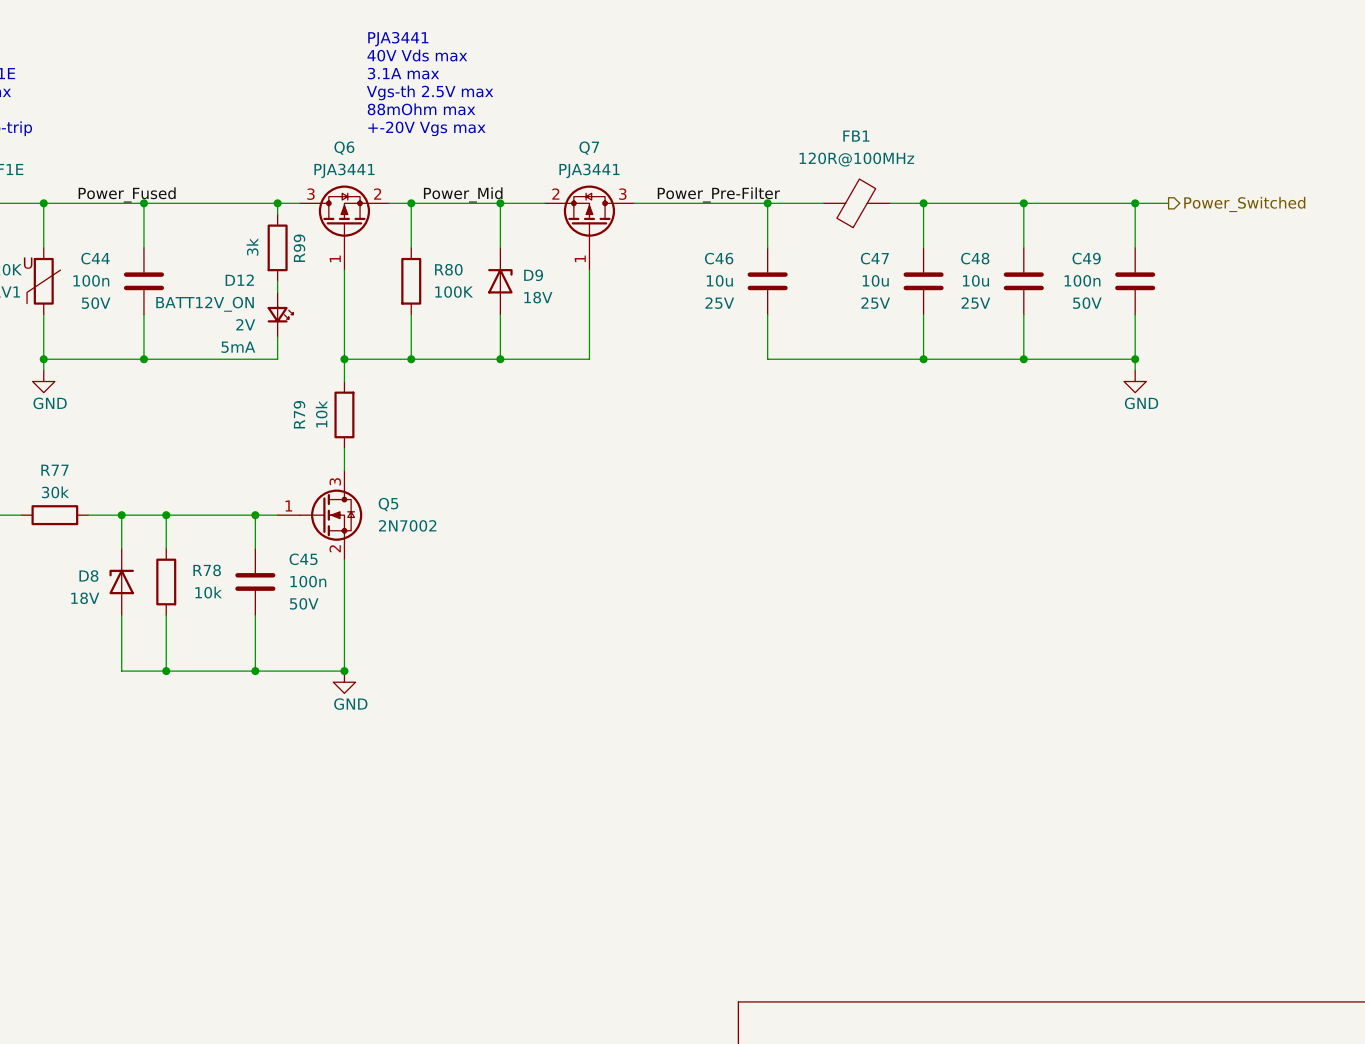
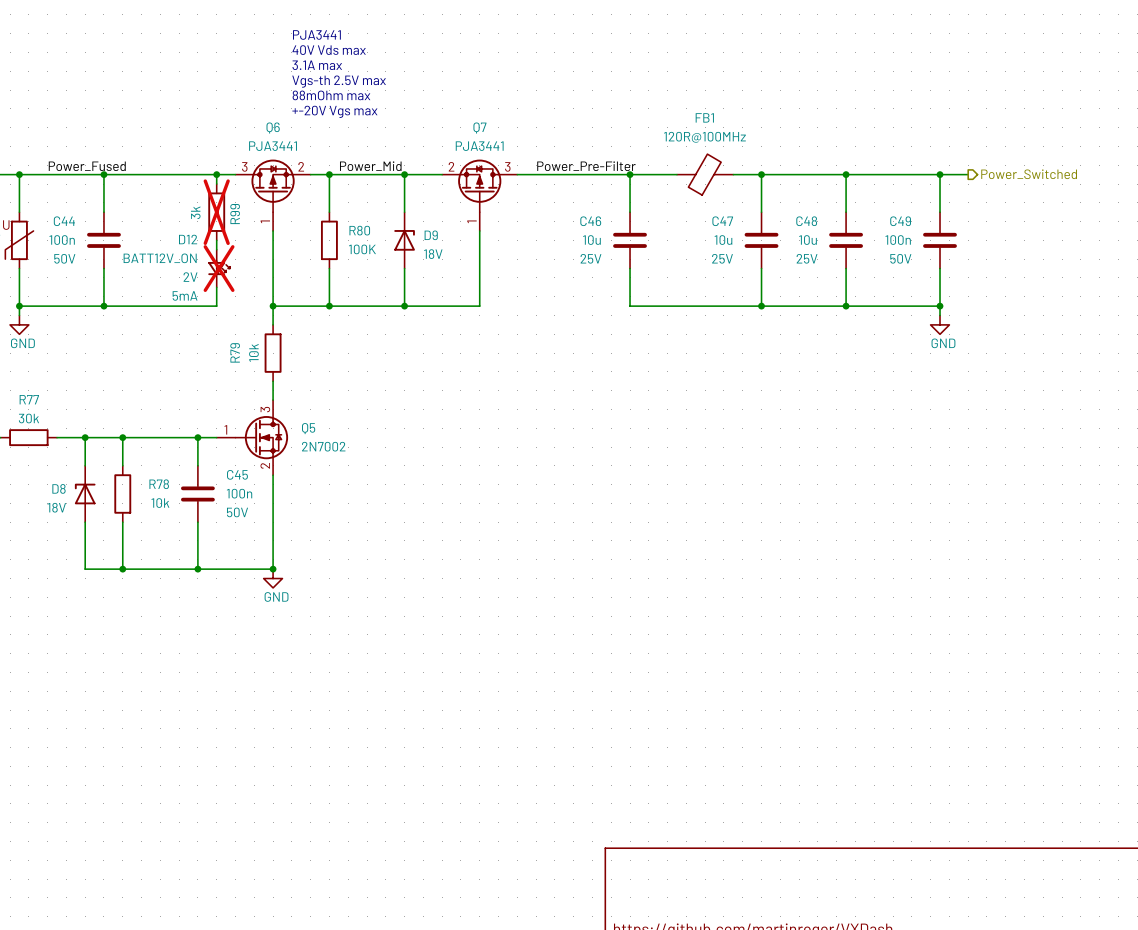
R99 do-not-place cross: none -> (216, 212)
D12 do-not-place cross: none -> (219, 268)

